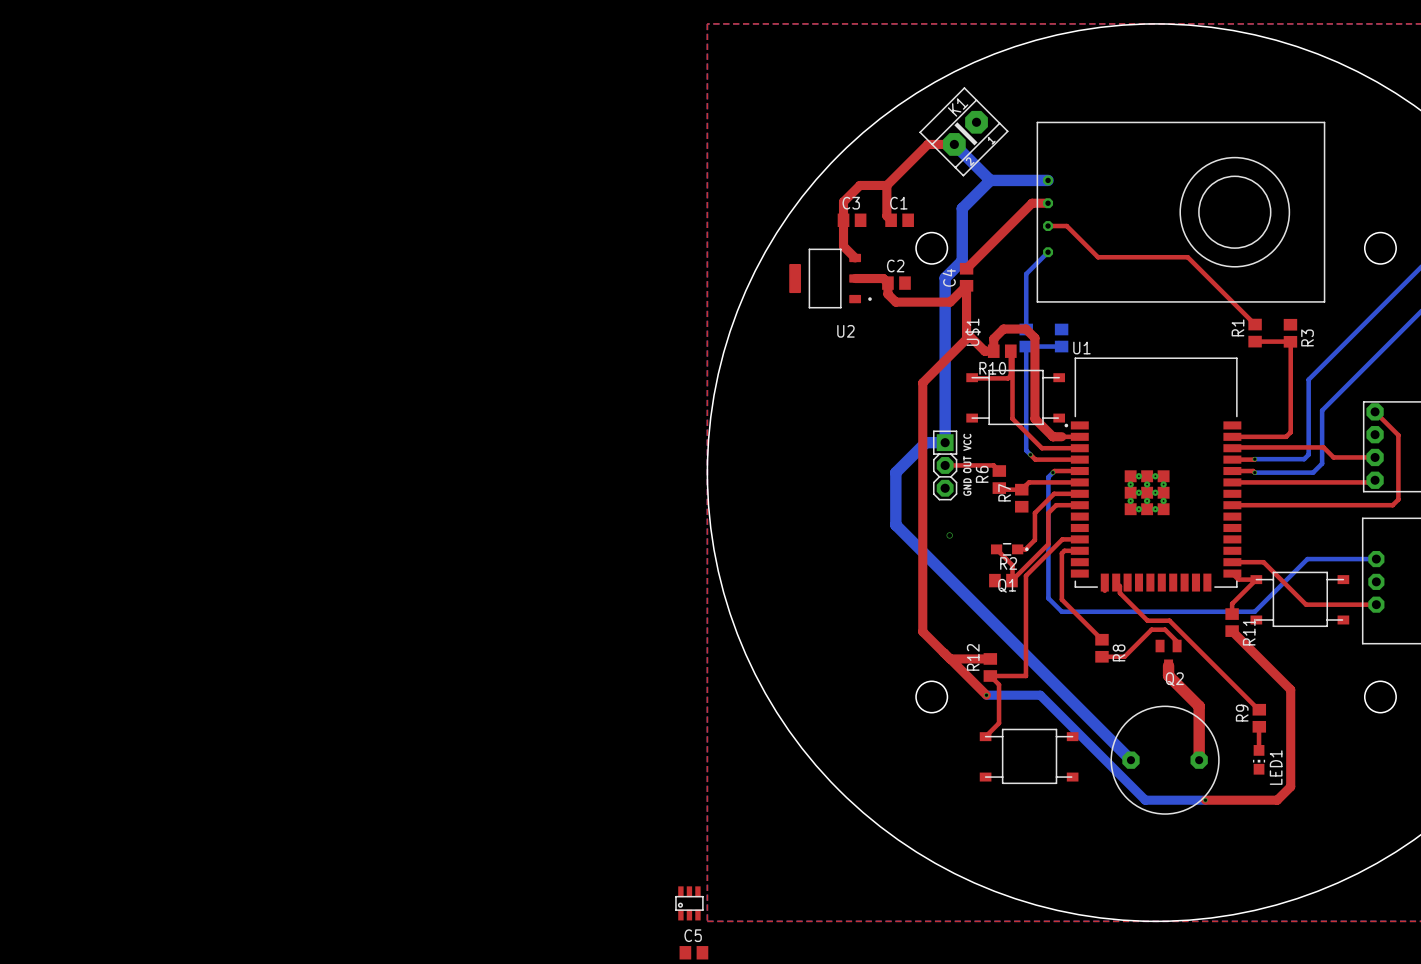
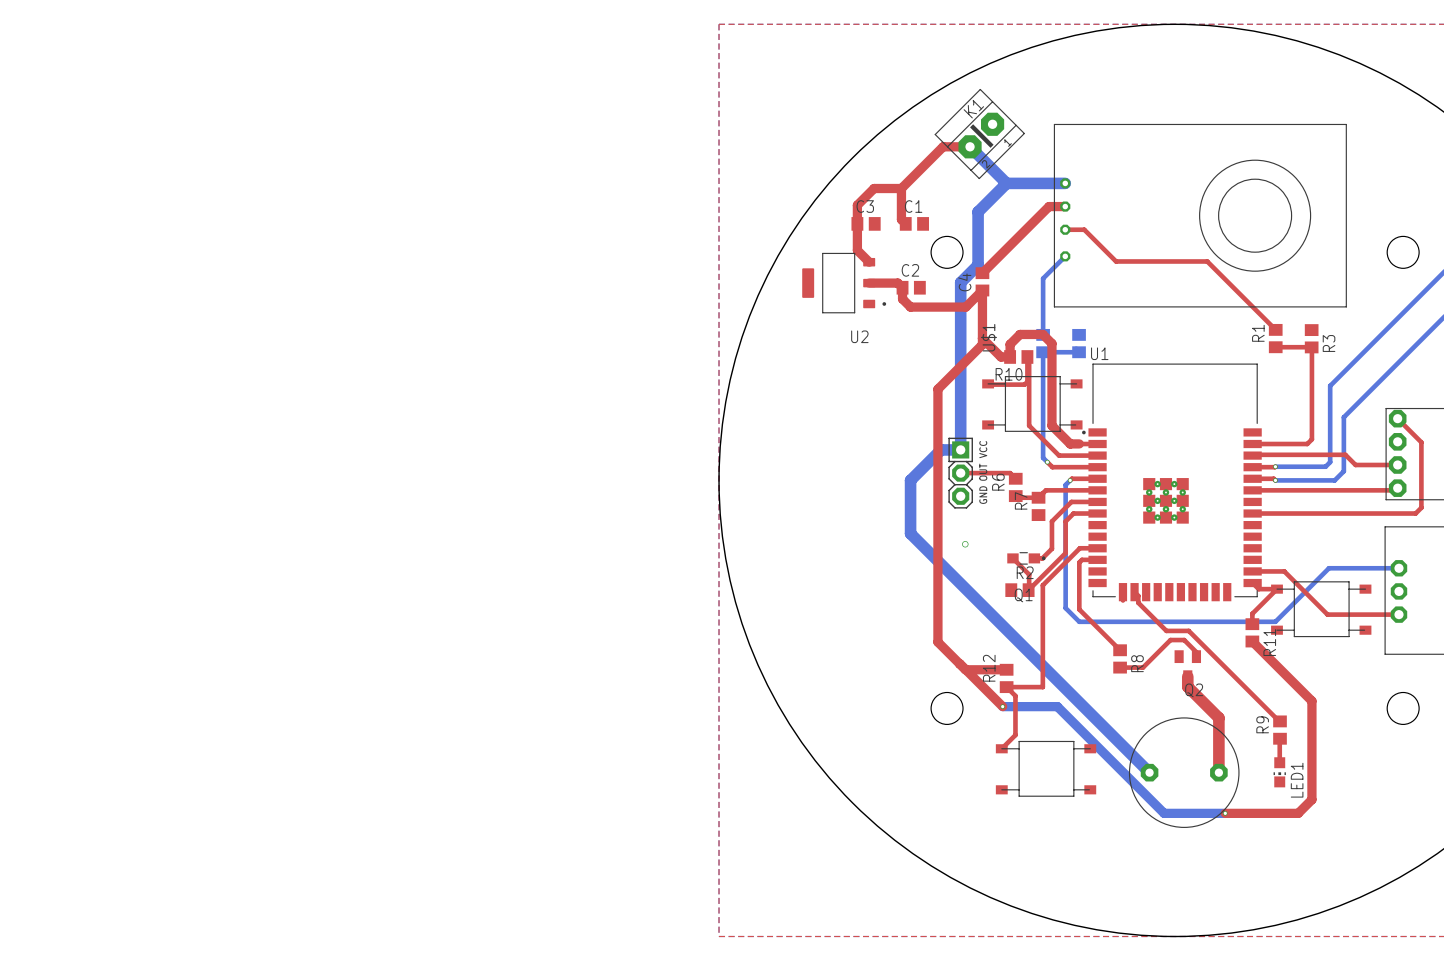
part: (689, 903) -> none
C5: (693, 952) -> none

